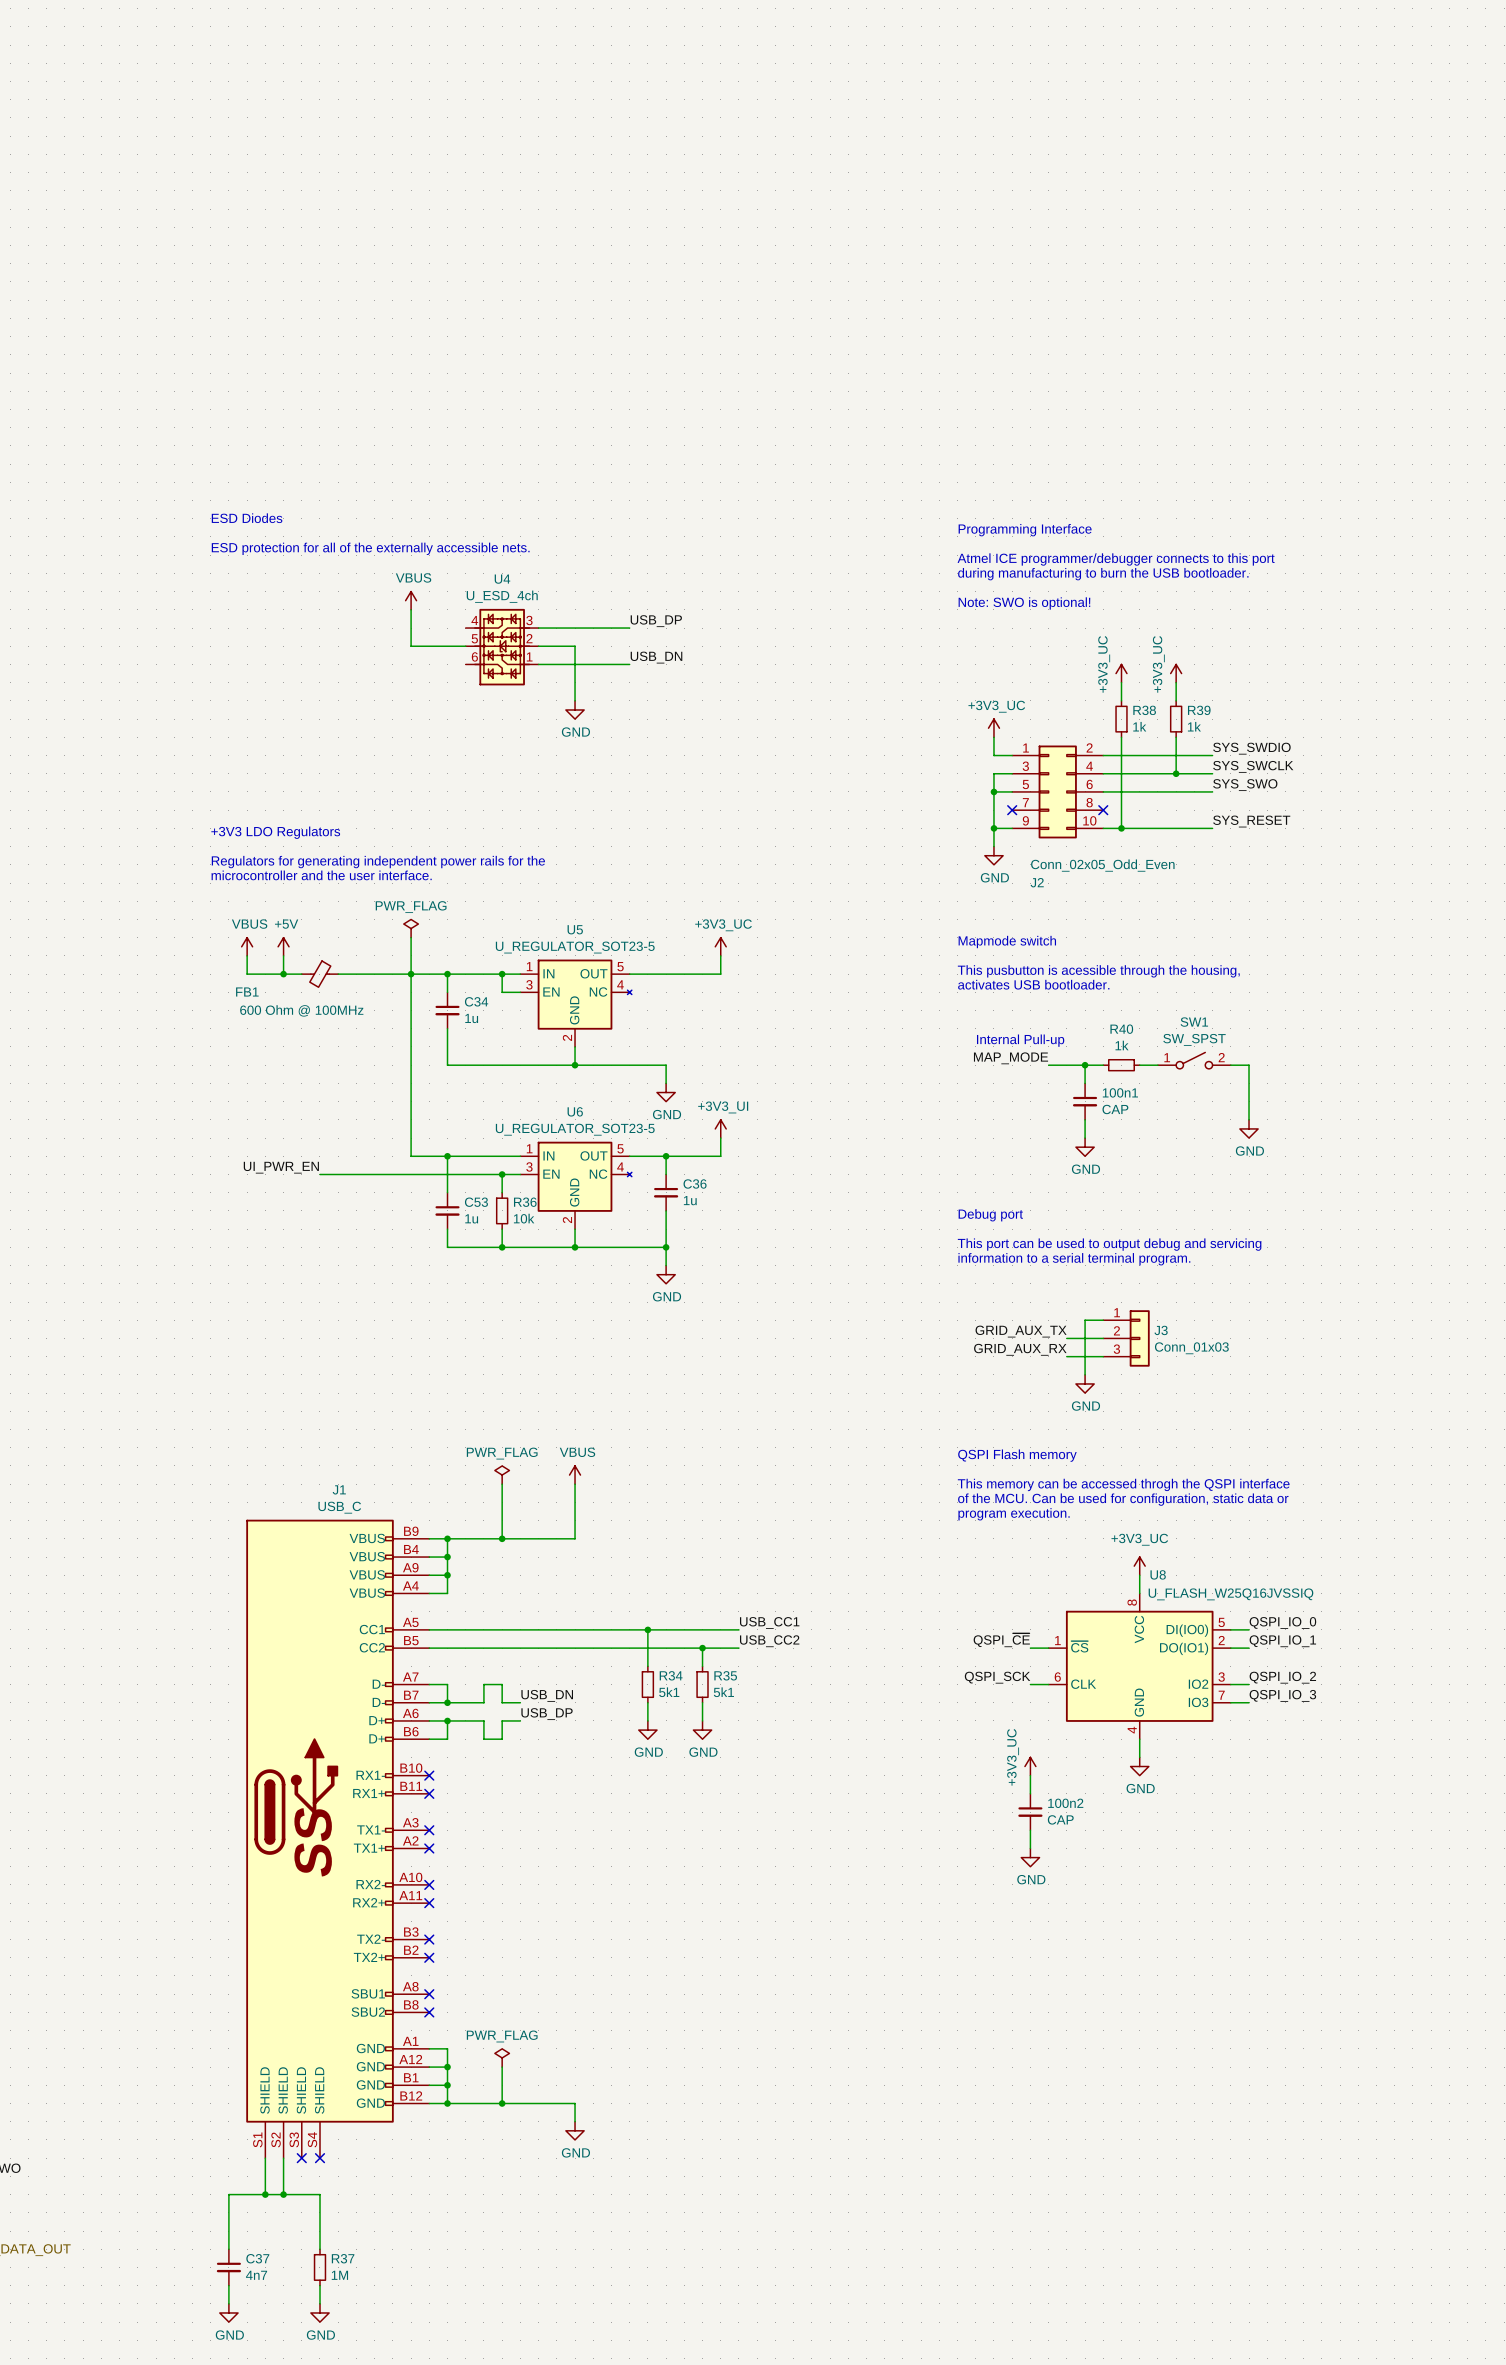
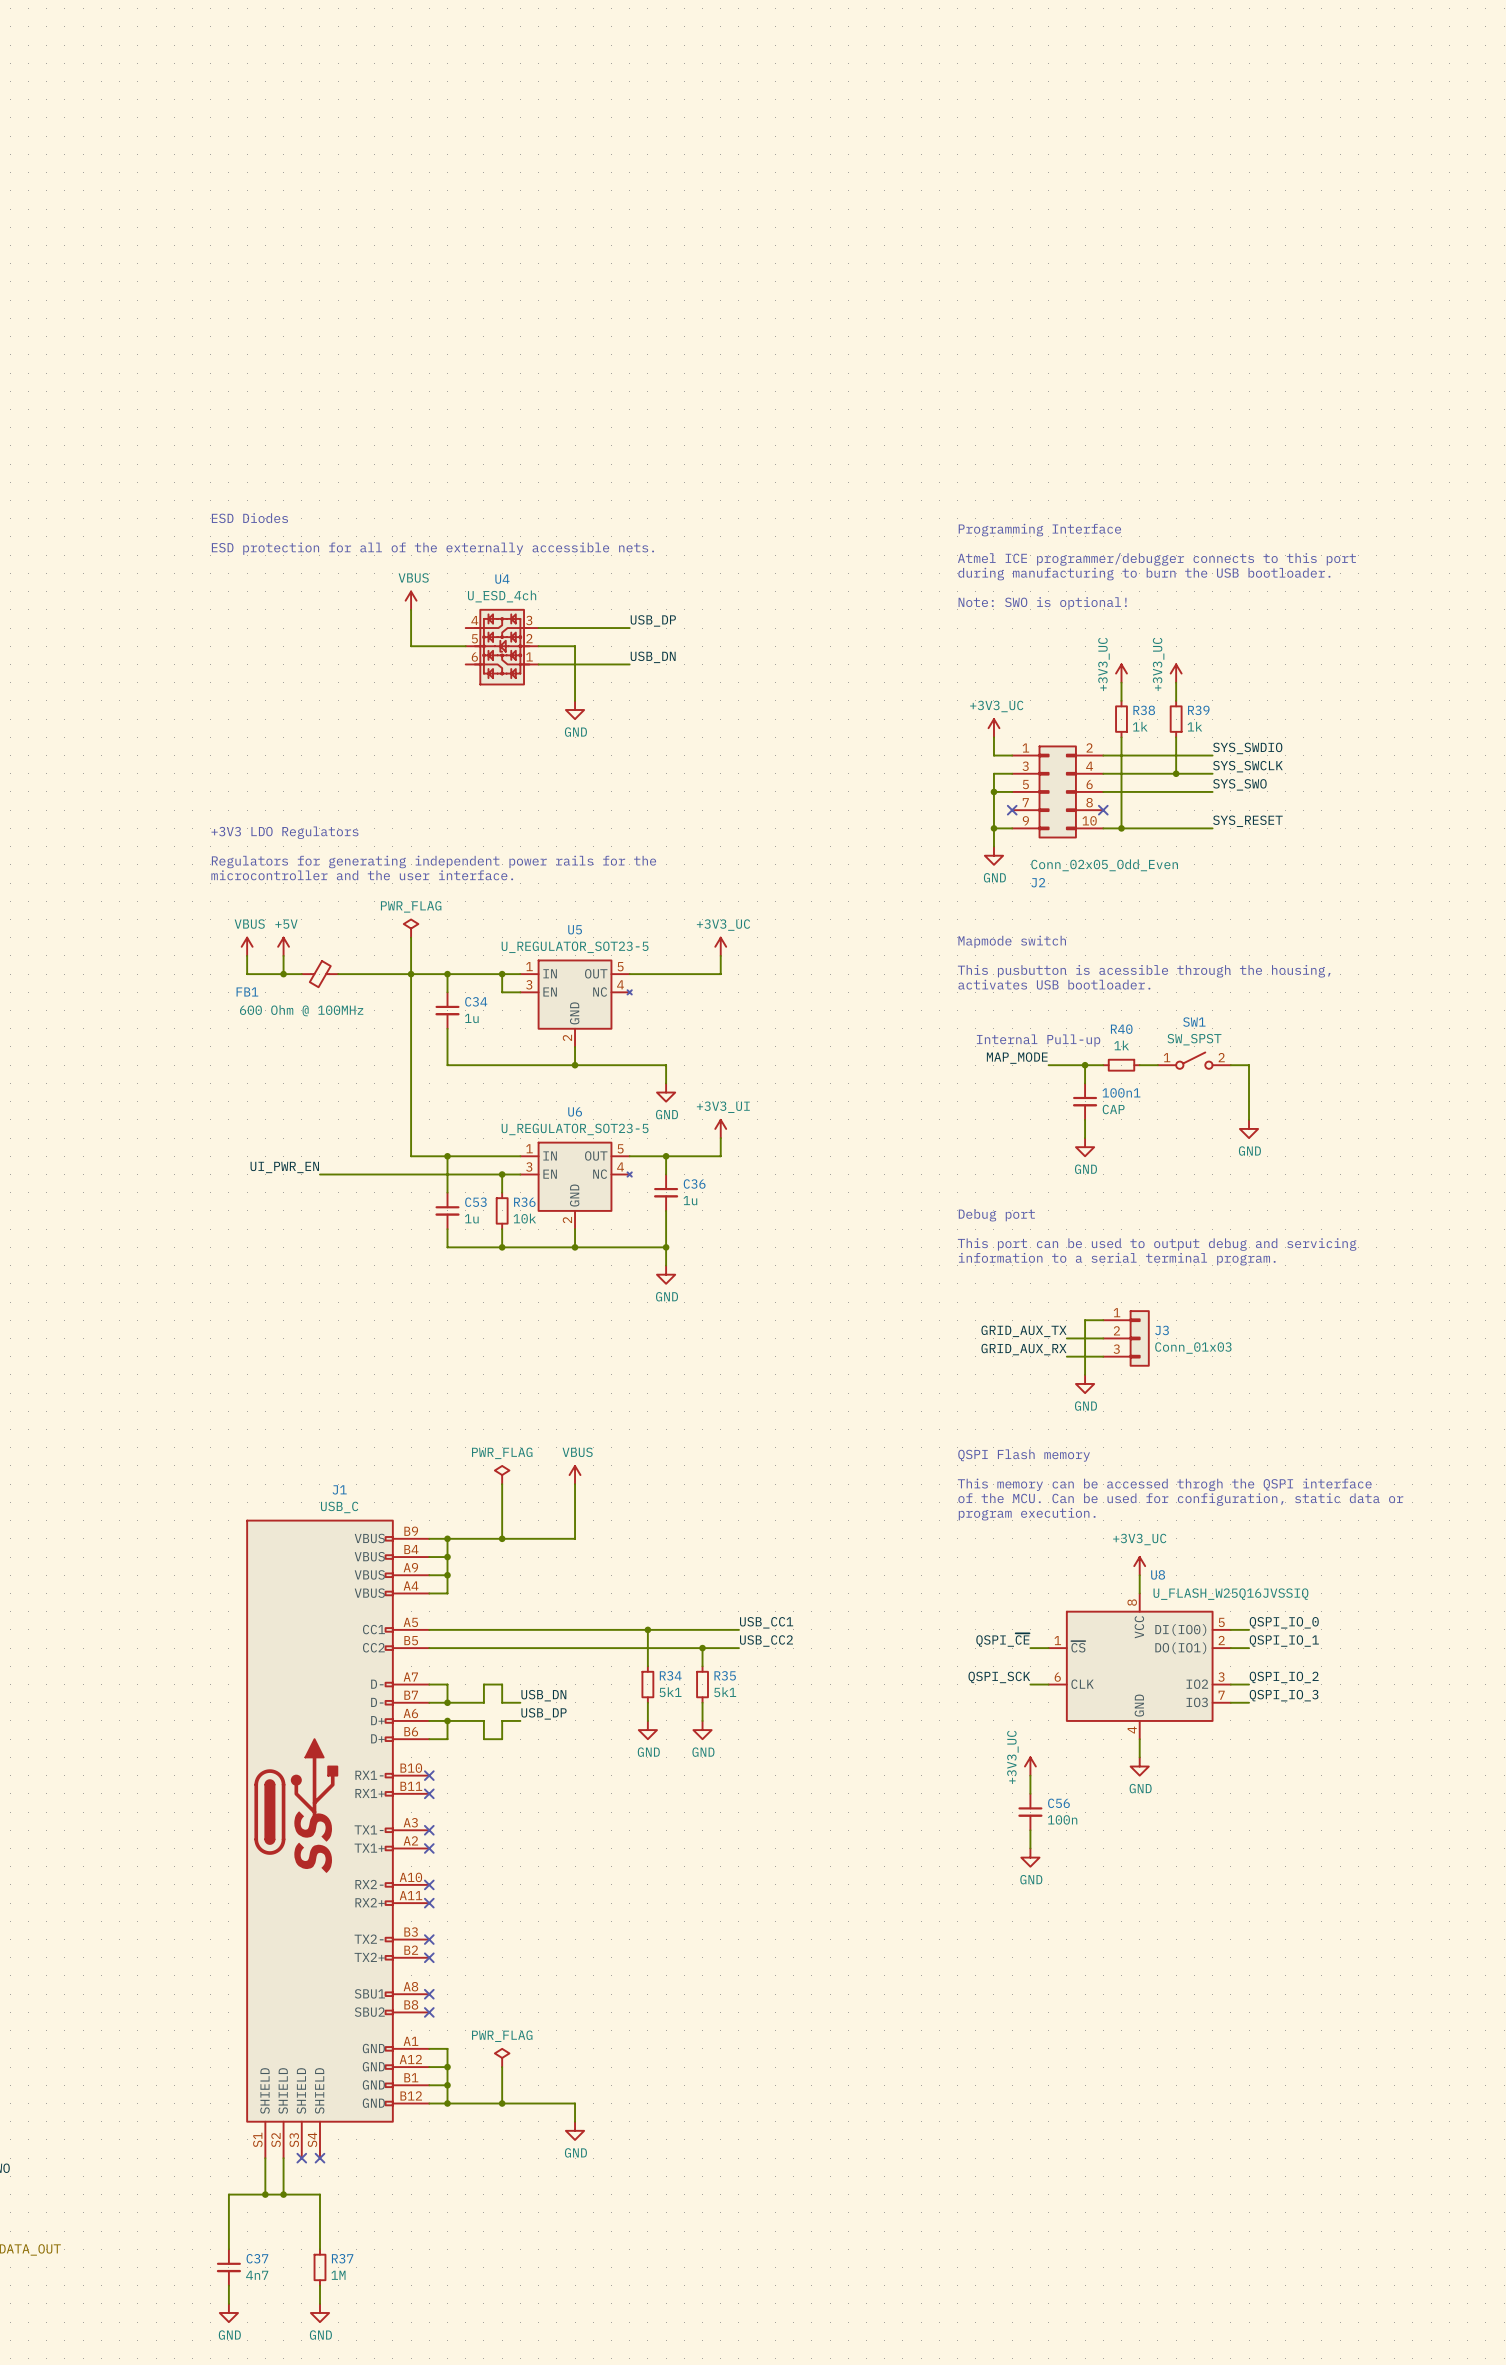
100n2 name: 100n2 (1065, 1803) -> C56 (1058, 1803)
100n2 value: CAP (1060, 1819) -> 100n (1062, 1819)

